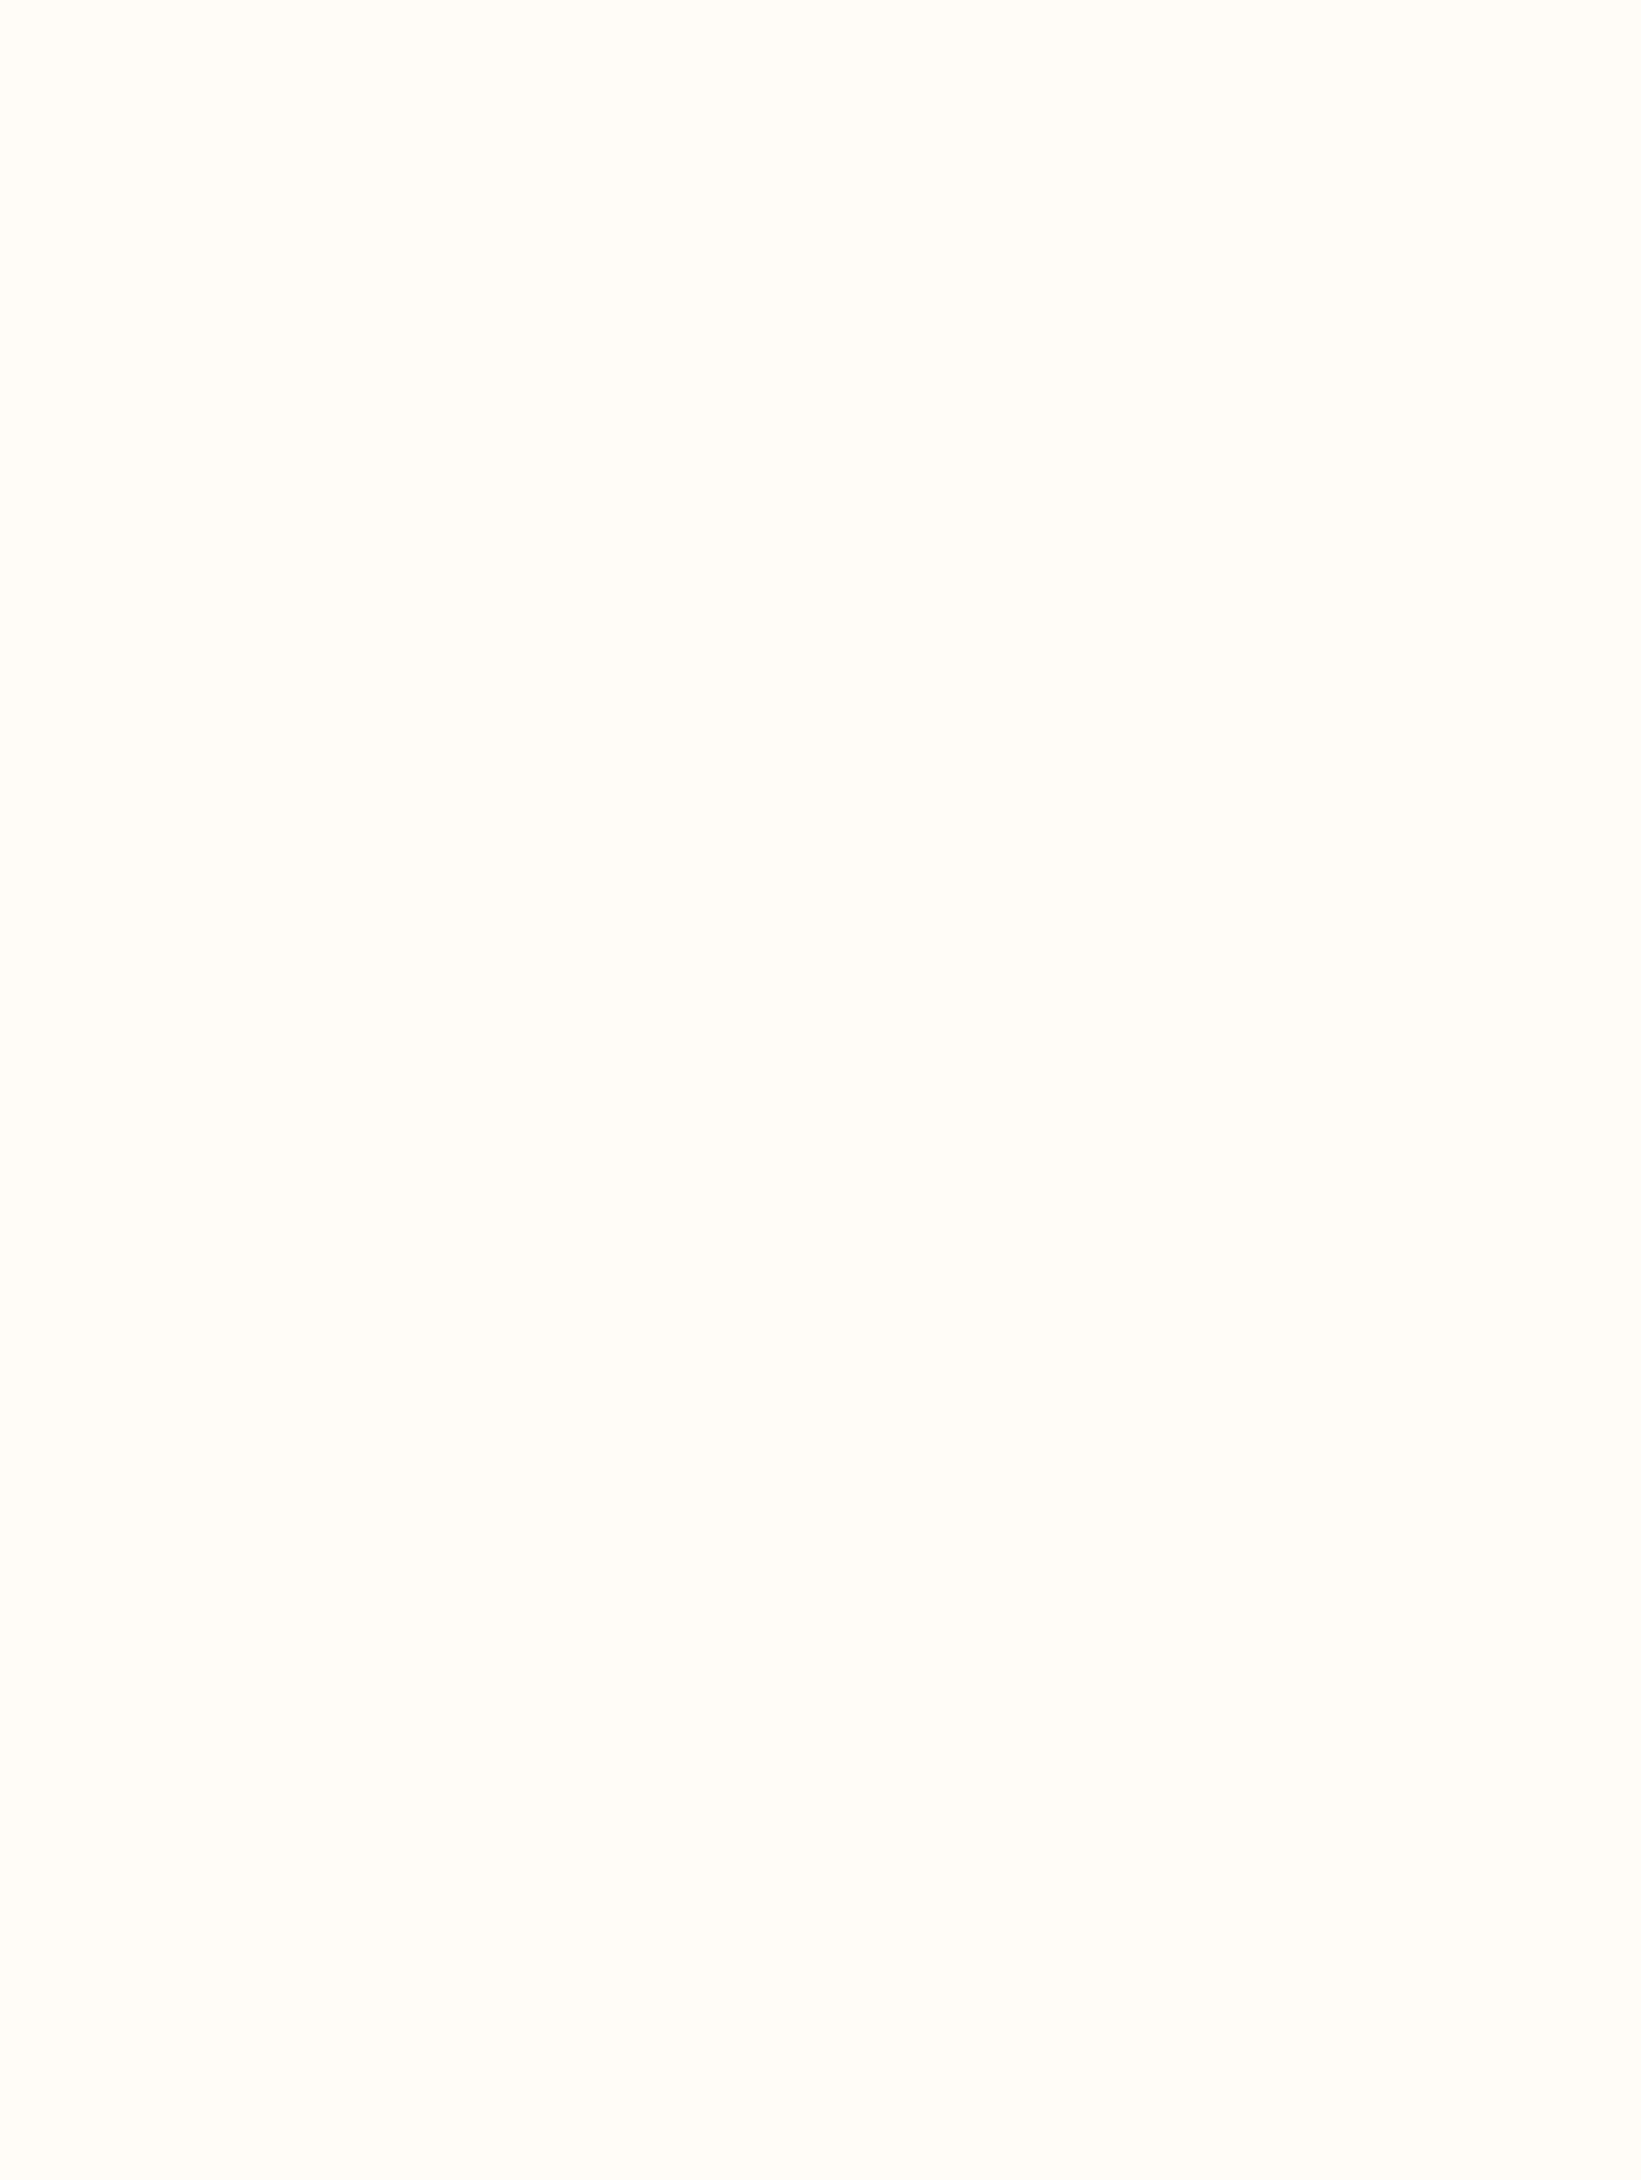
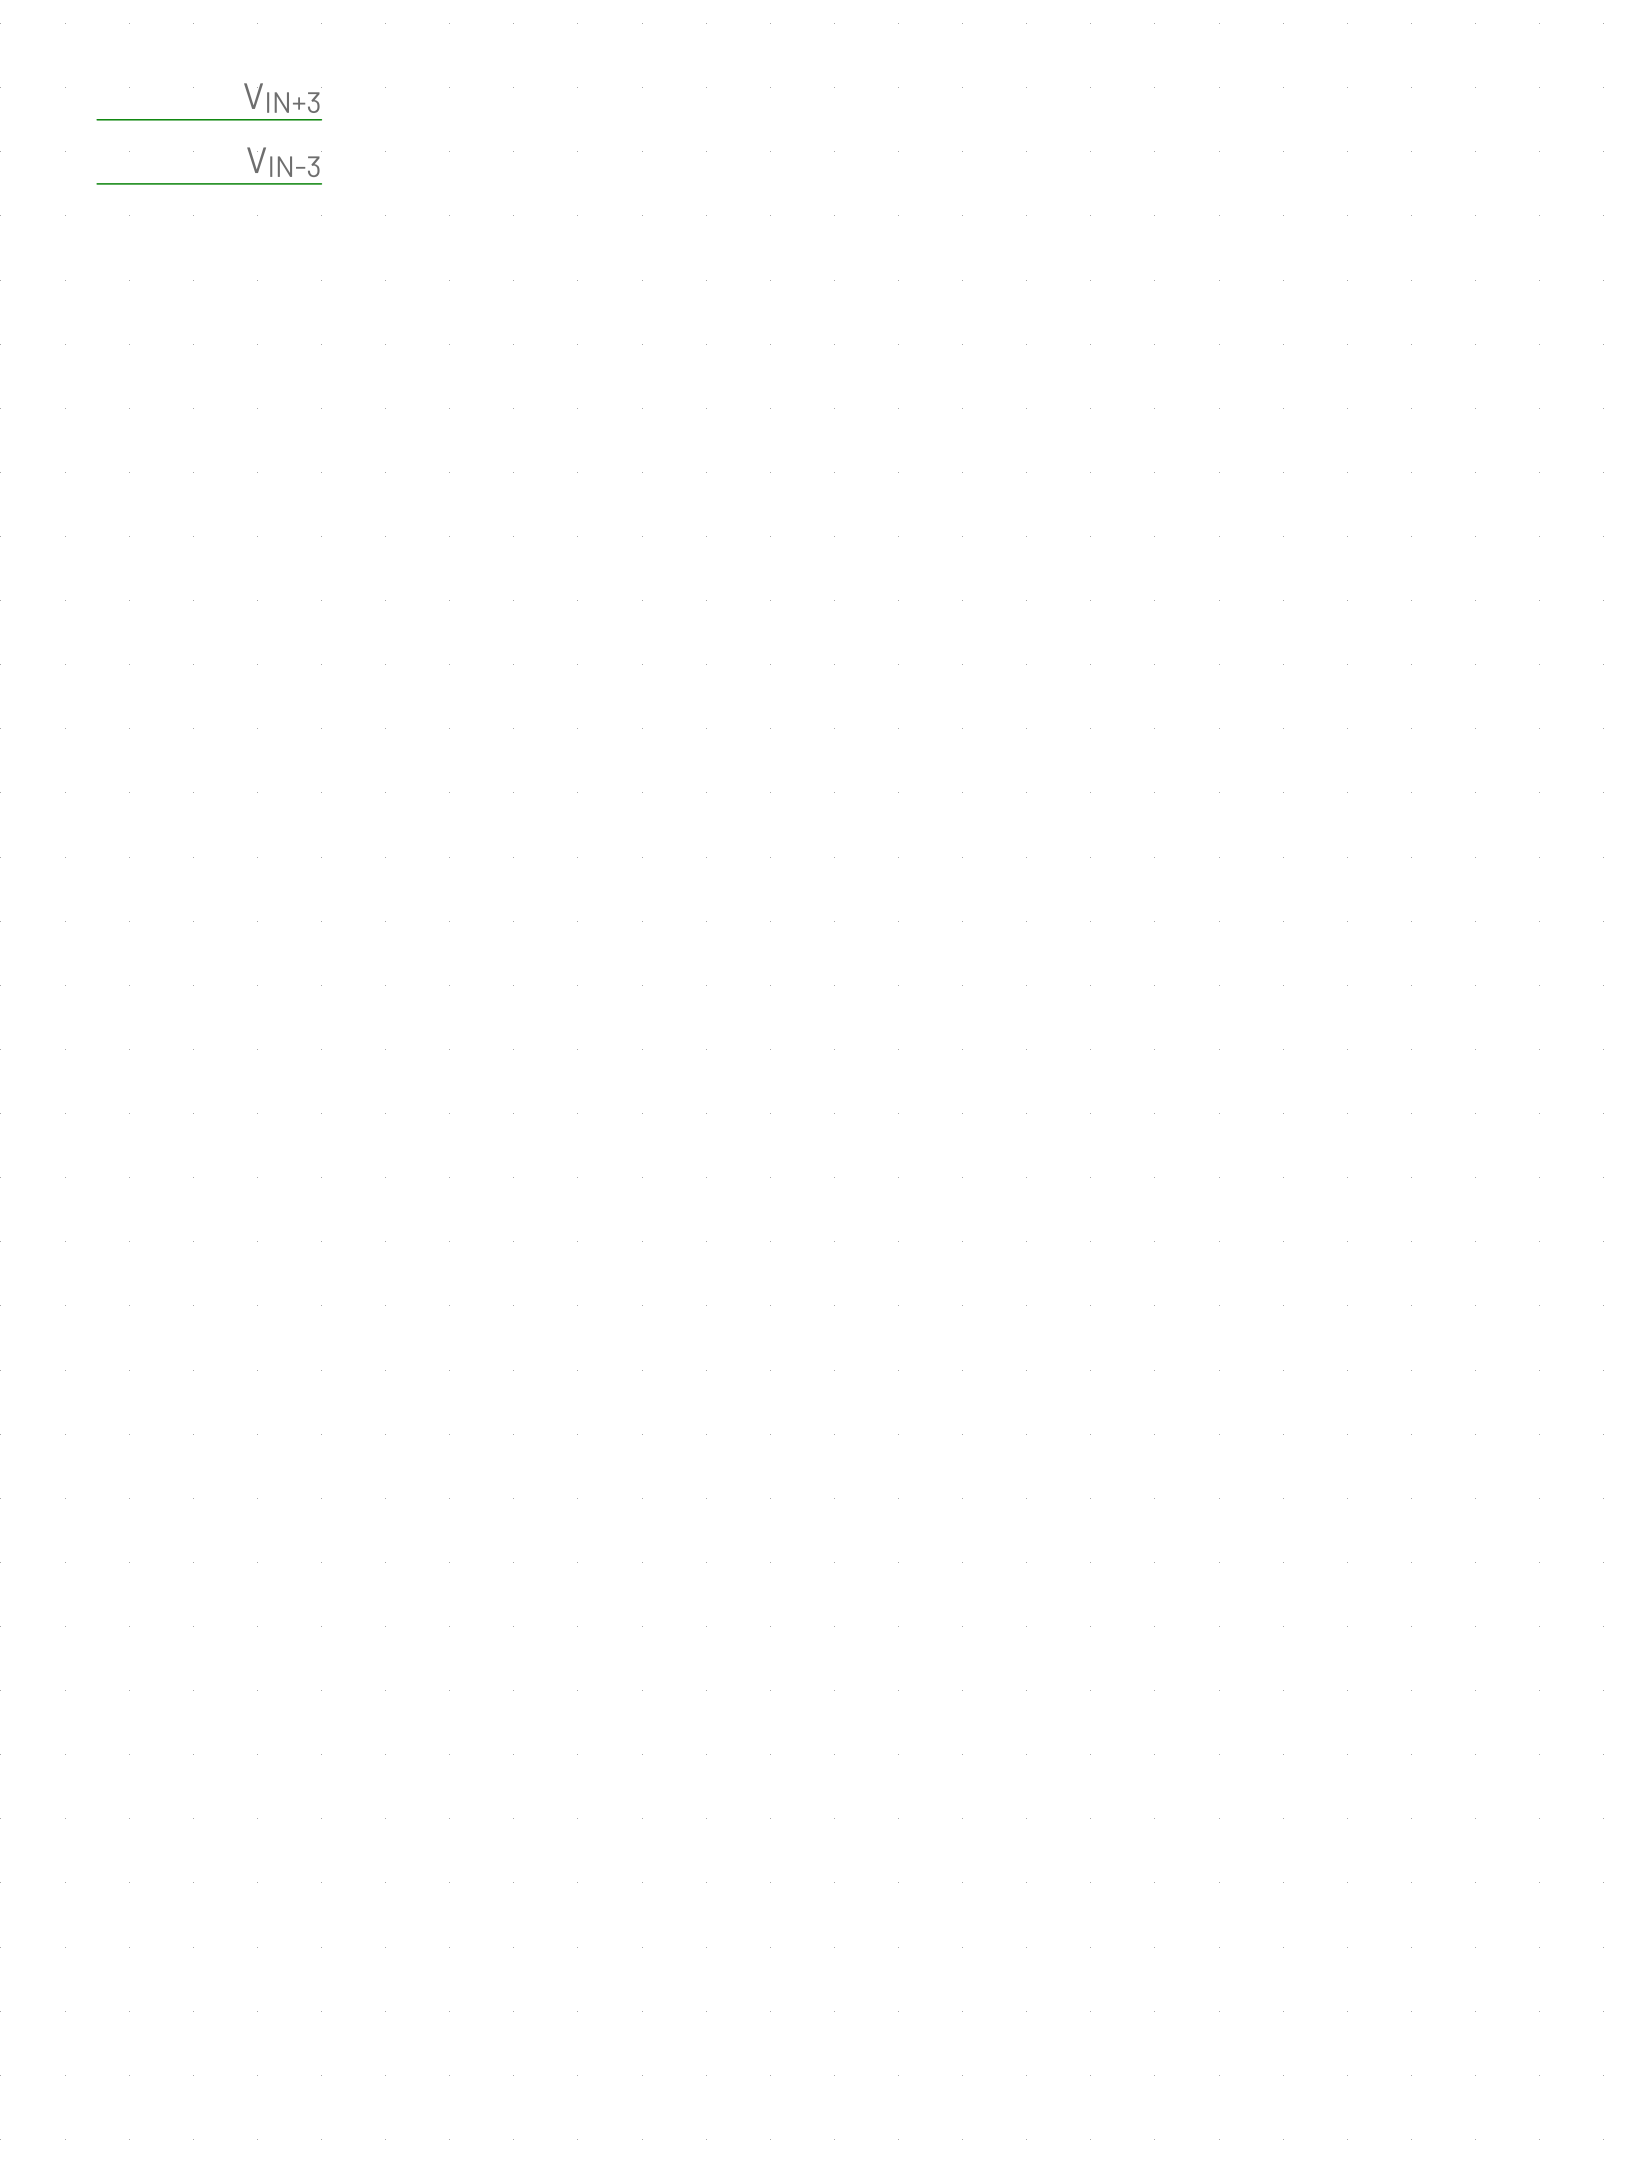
label: none -> VIN+3 (281, 98)
wire: none -> (97, 119) (321, 119)
label: none -> VIN-3 (283, 162)
wire: none -> (97, 183) (321, 183)

